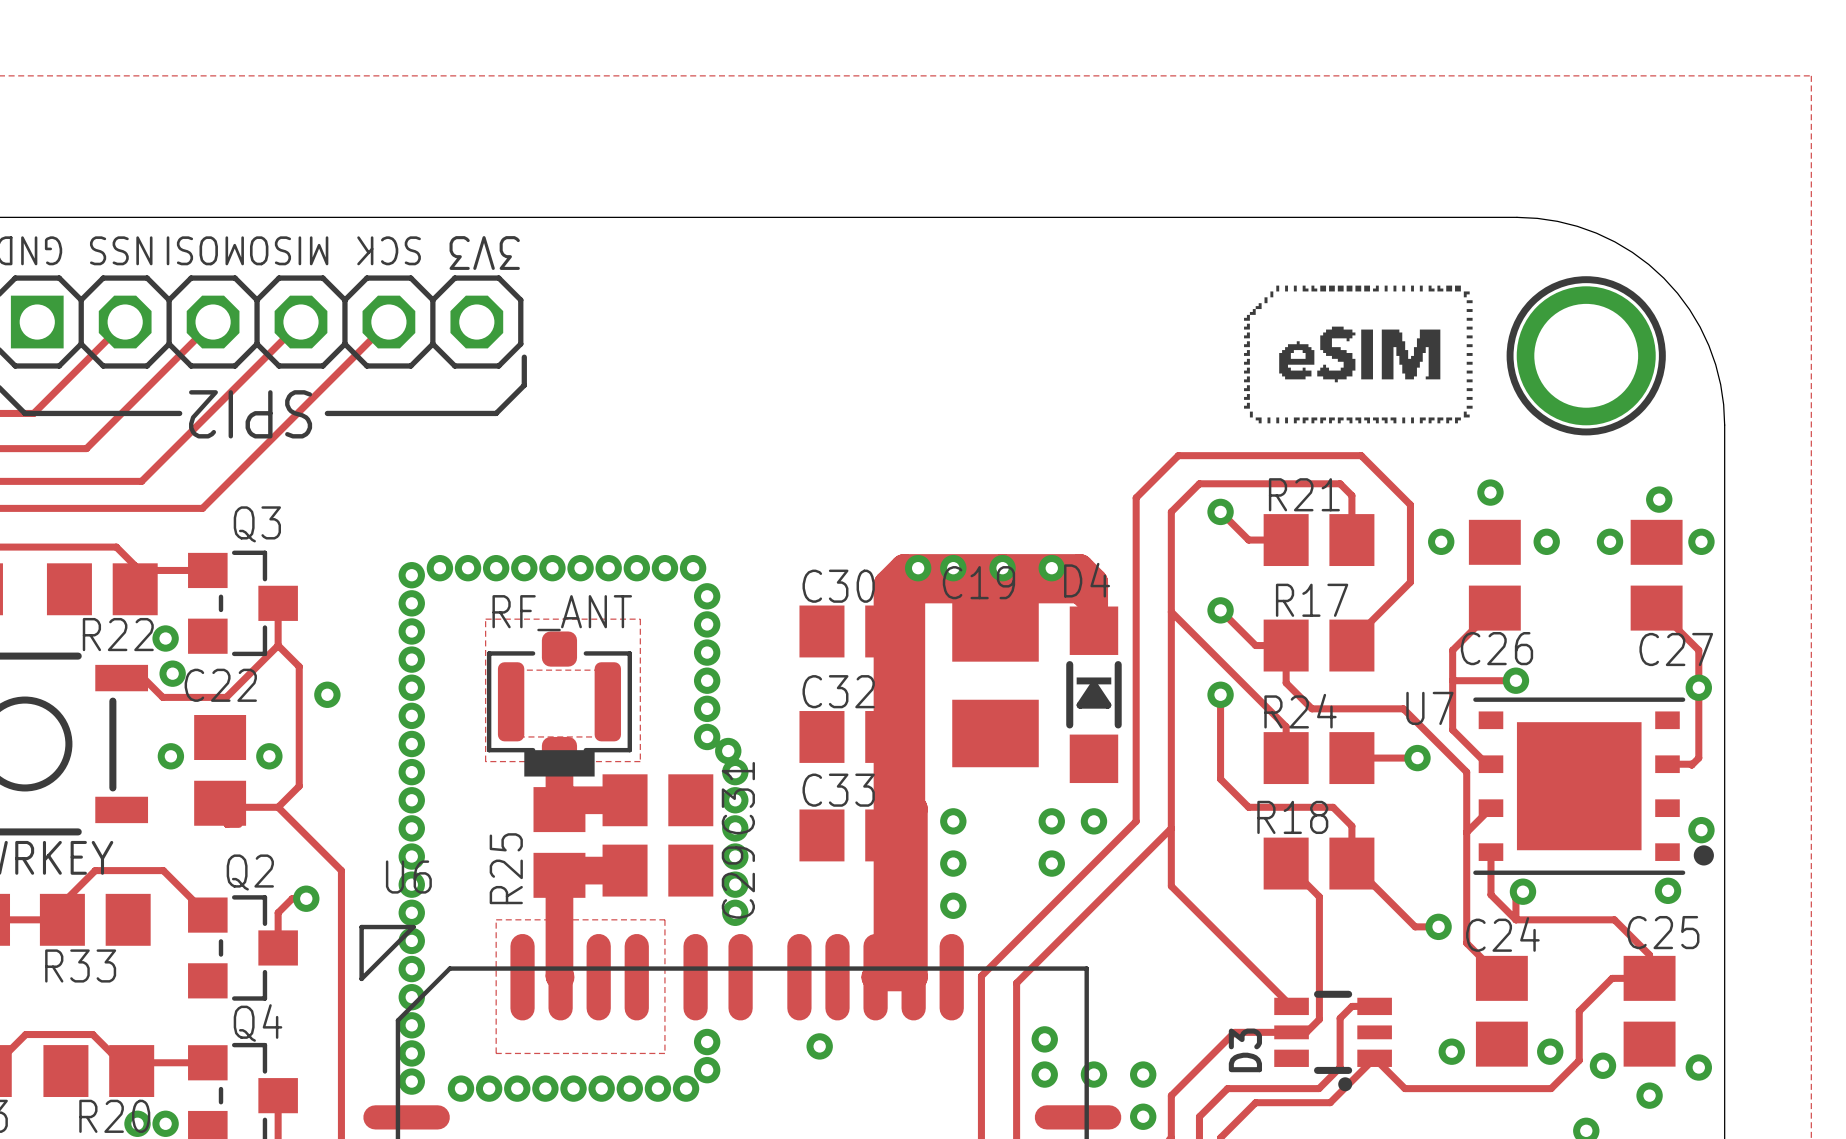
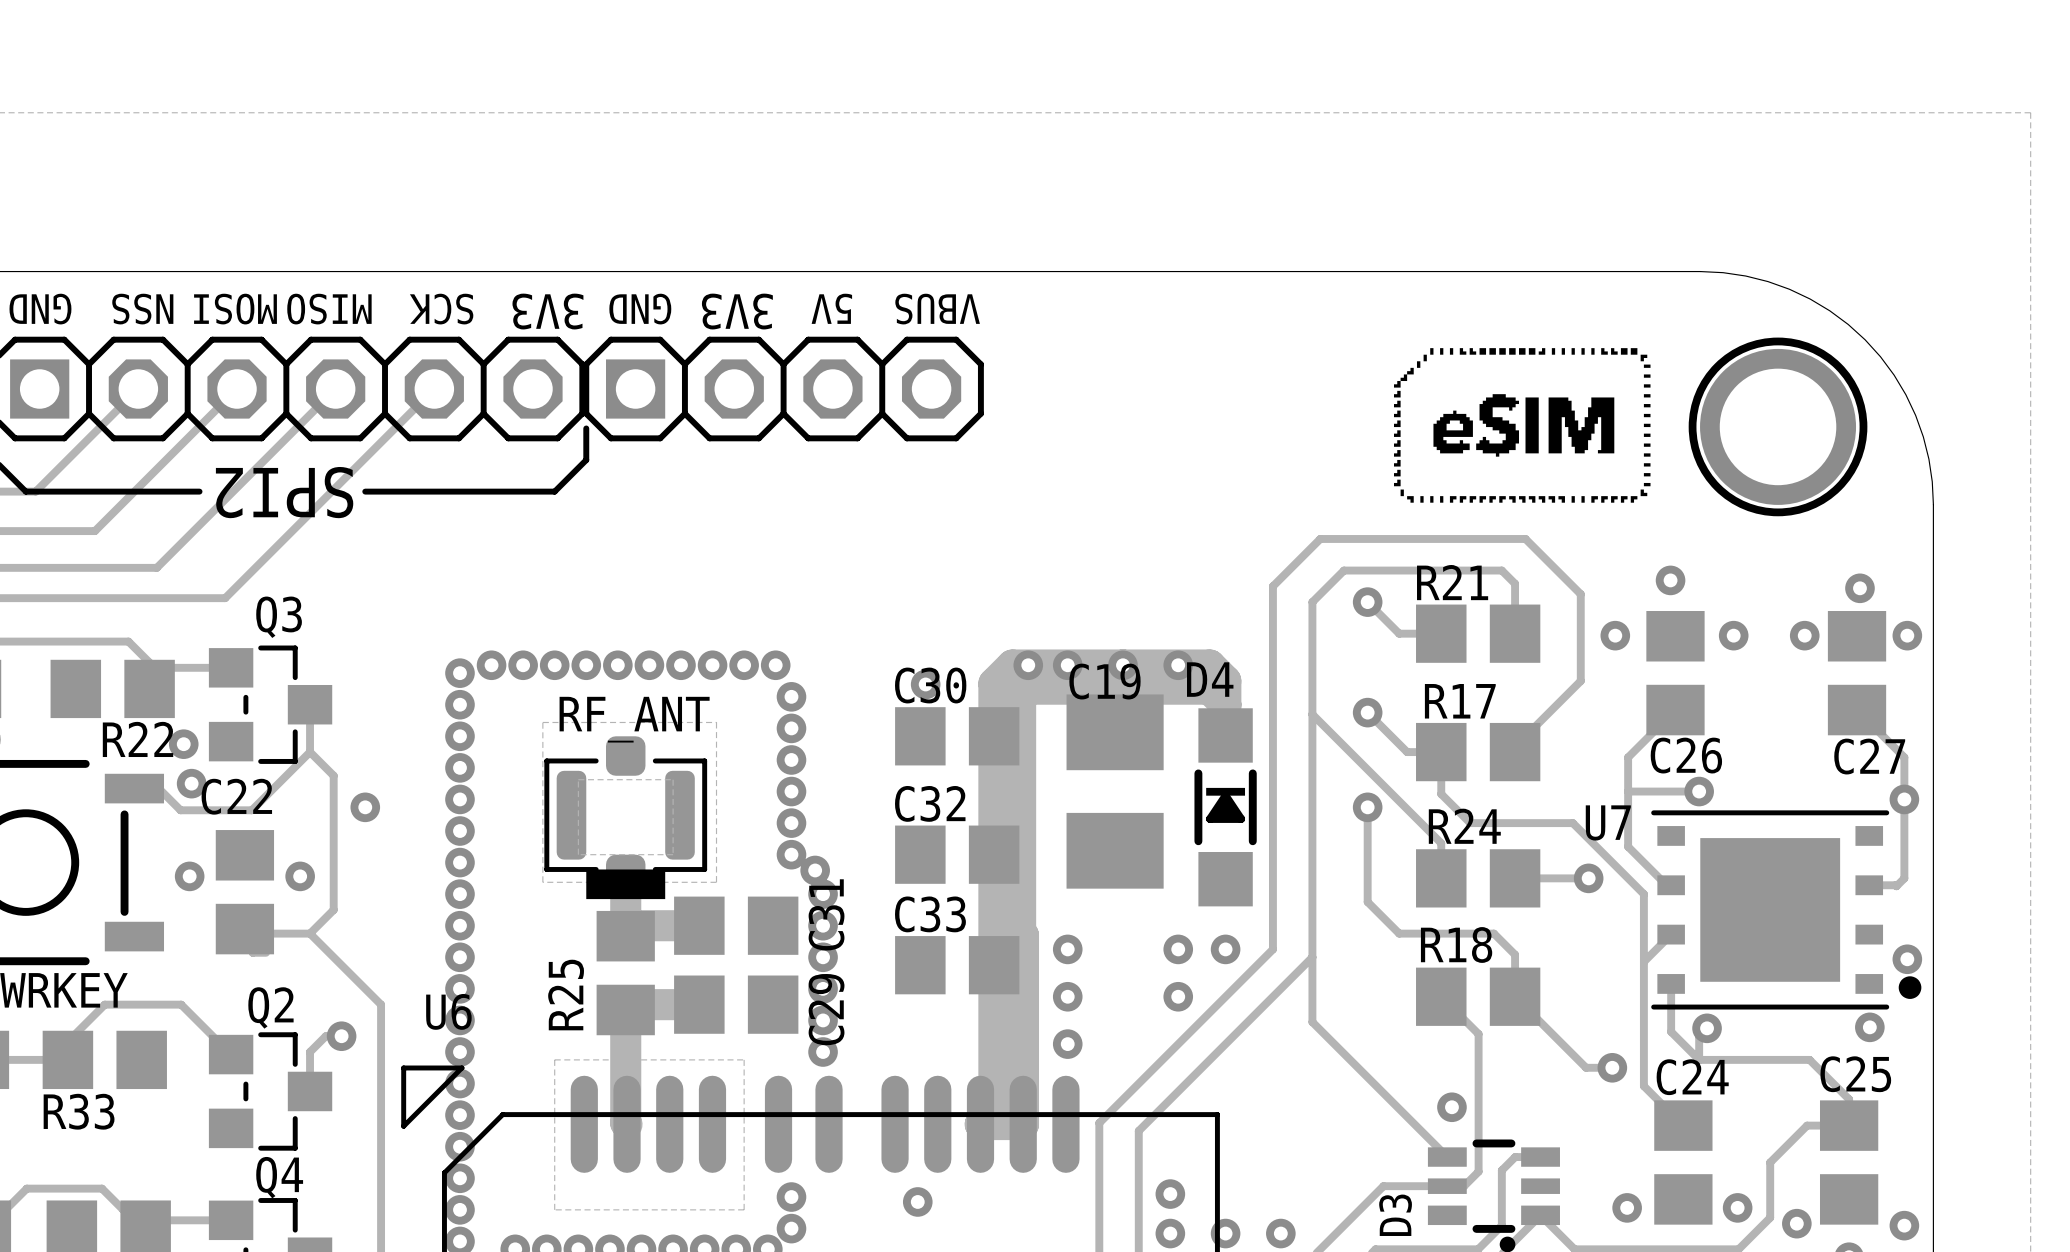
text: none -> GND (640, 309)
text: none -> 5V (831, 308)
text: none -> VBUS (937, 309)
text: none -> 3V3 (737, 311)
part: none -> (783, 389)
via: none -> (925, 684)
via: none -> (1451, 1107)

